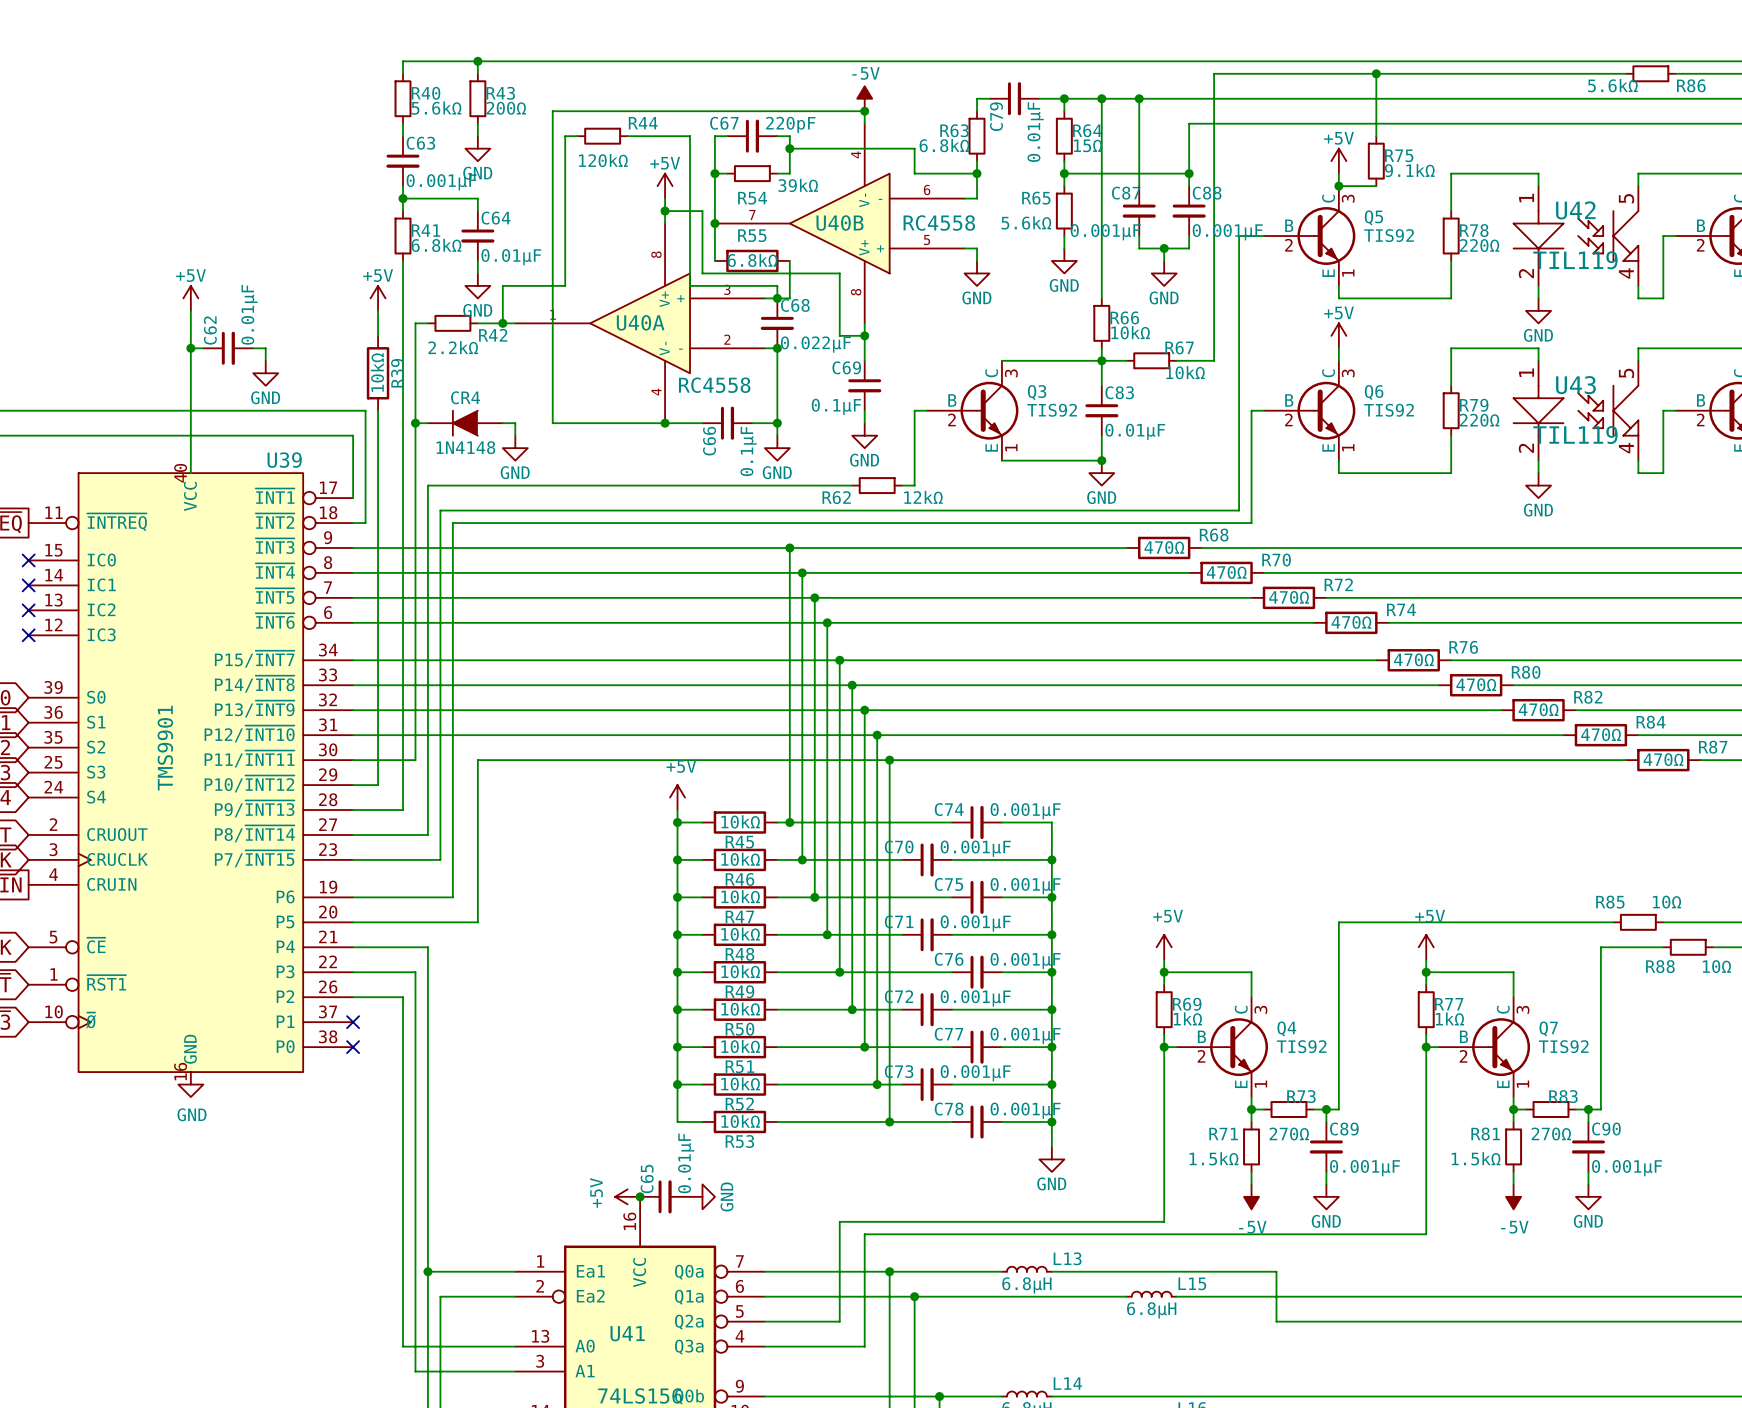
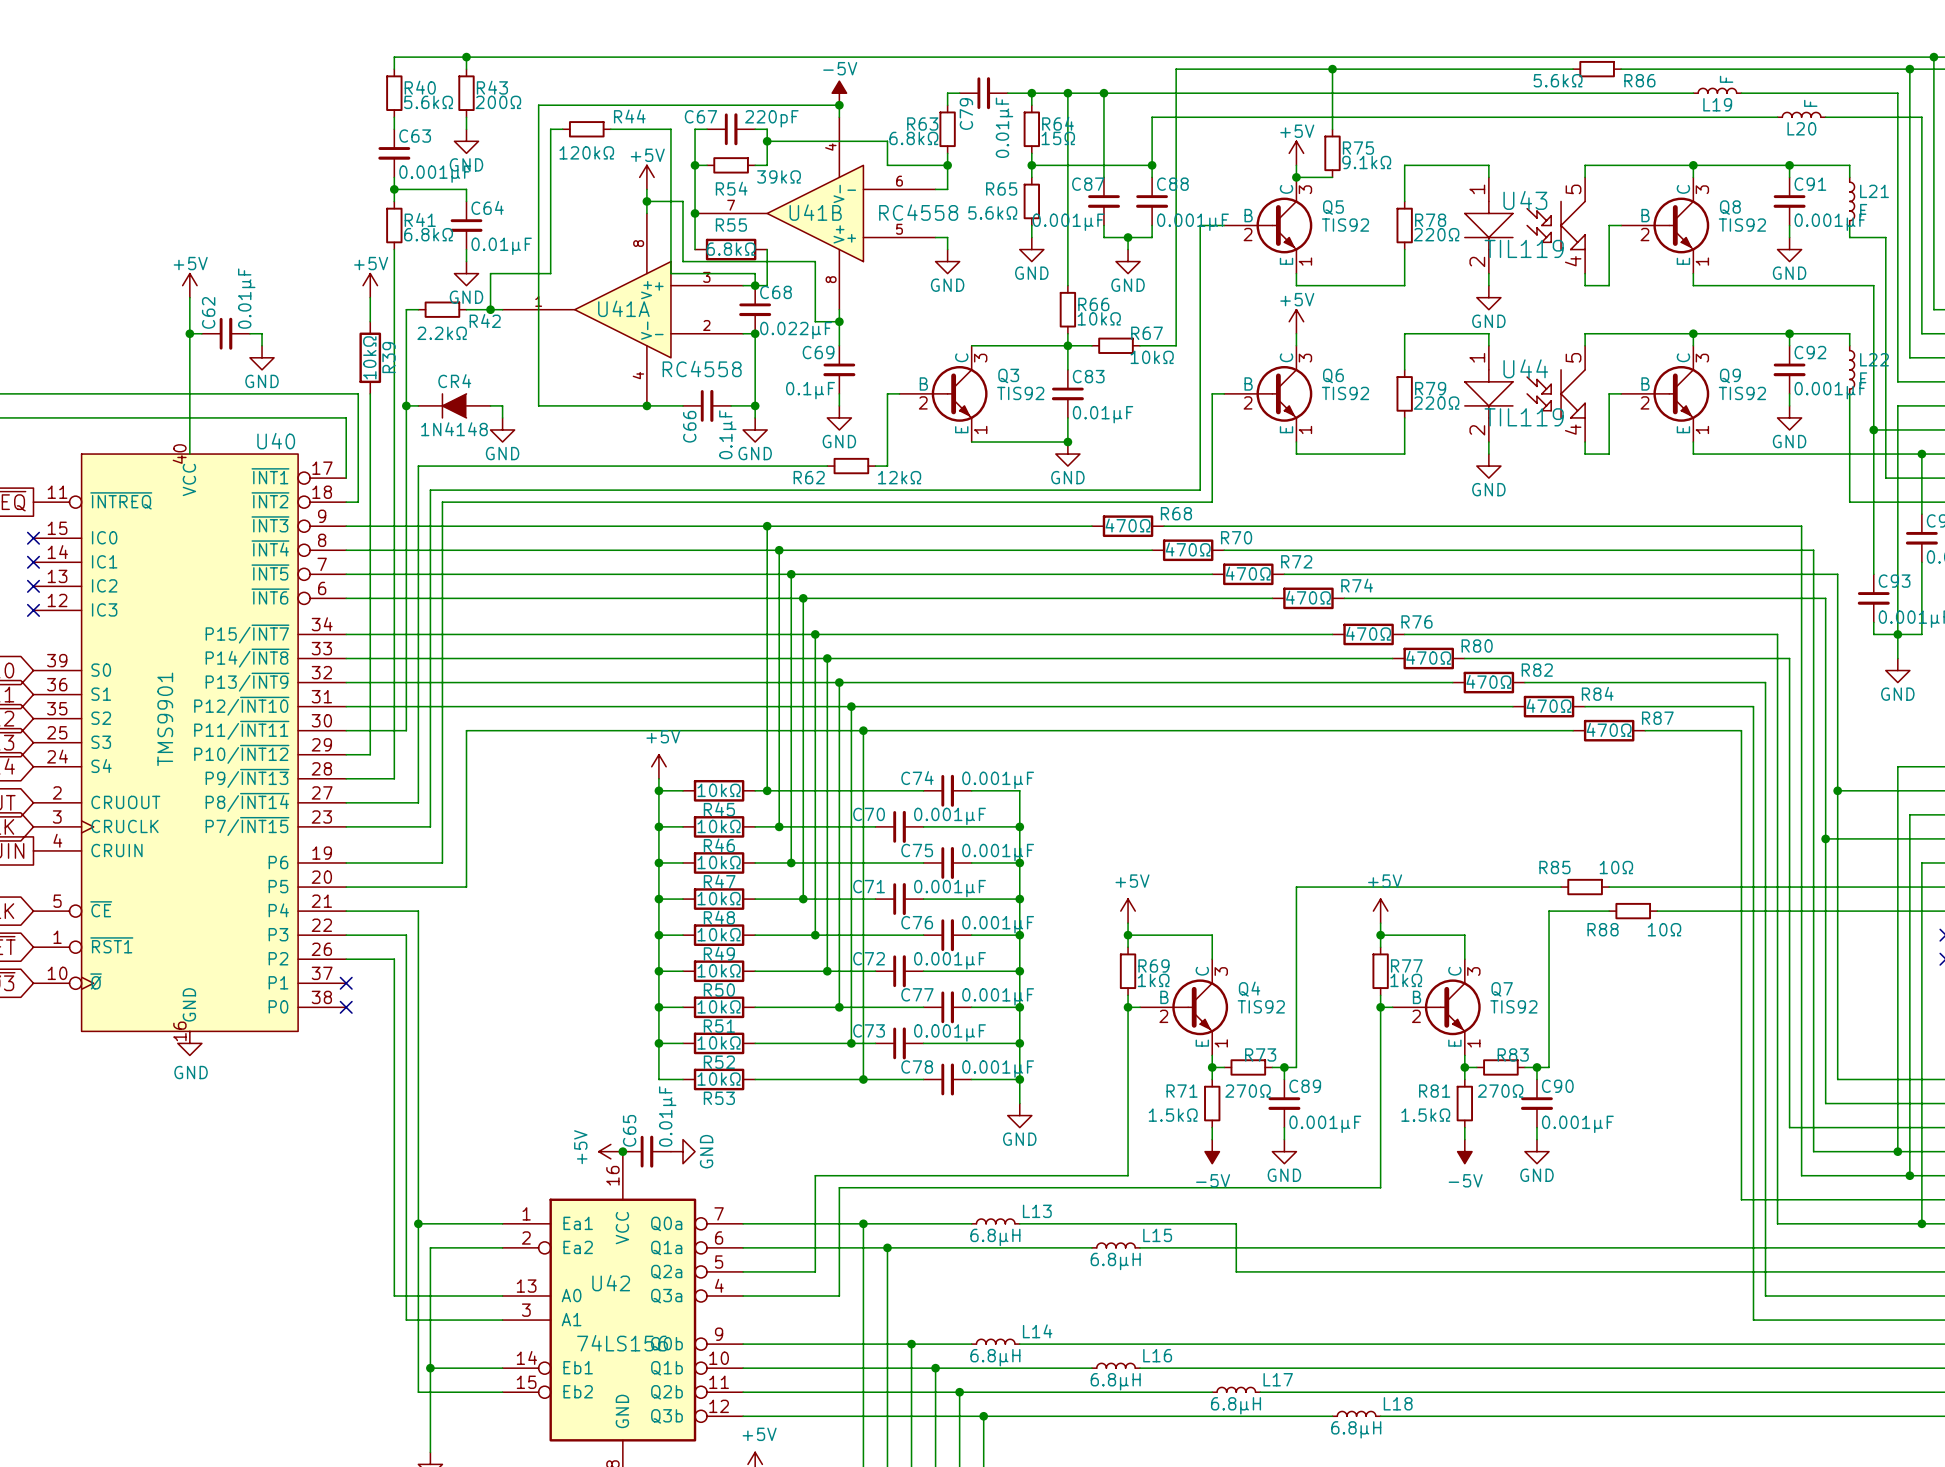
U42 name: U42 (1575, 210) -> U43 (1525, 200)
U40B name: U40B (840, 222) -> U41B (815, 212)
U40A name: U40A (640, 322) -> U41A (623, 308)
U43 name: U43 (1575, 385) -> U44 (1525, 368)
U39 name: U39 (284, 460) -> U40 (276, 441)
U41 name: U41 (627, 1333) -> U42 (611, 1283)

